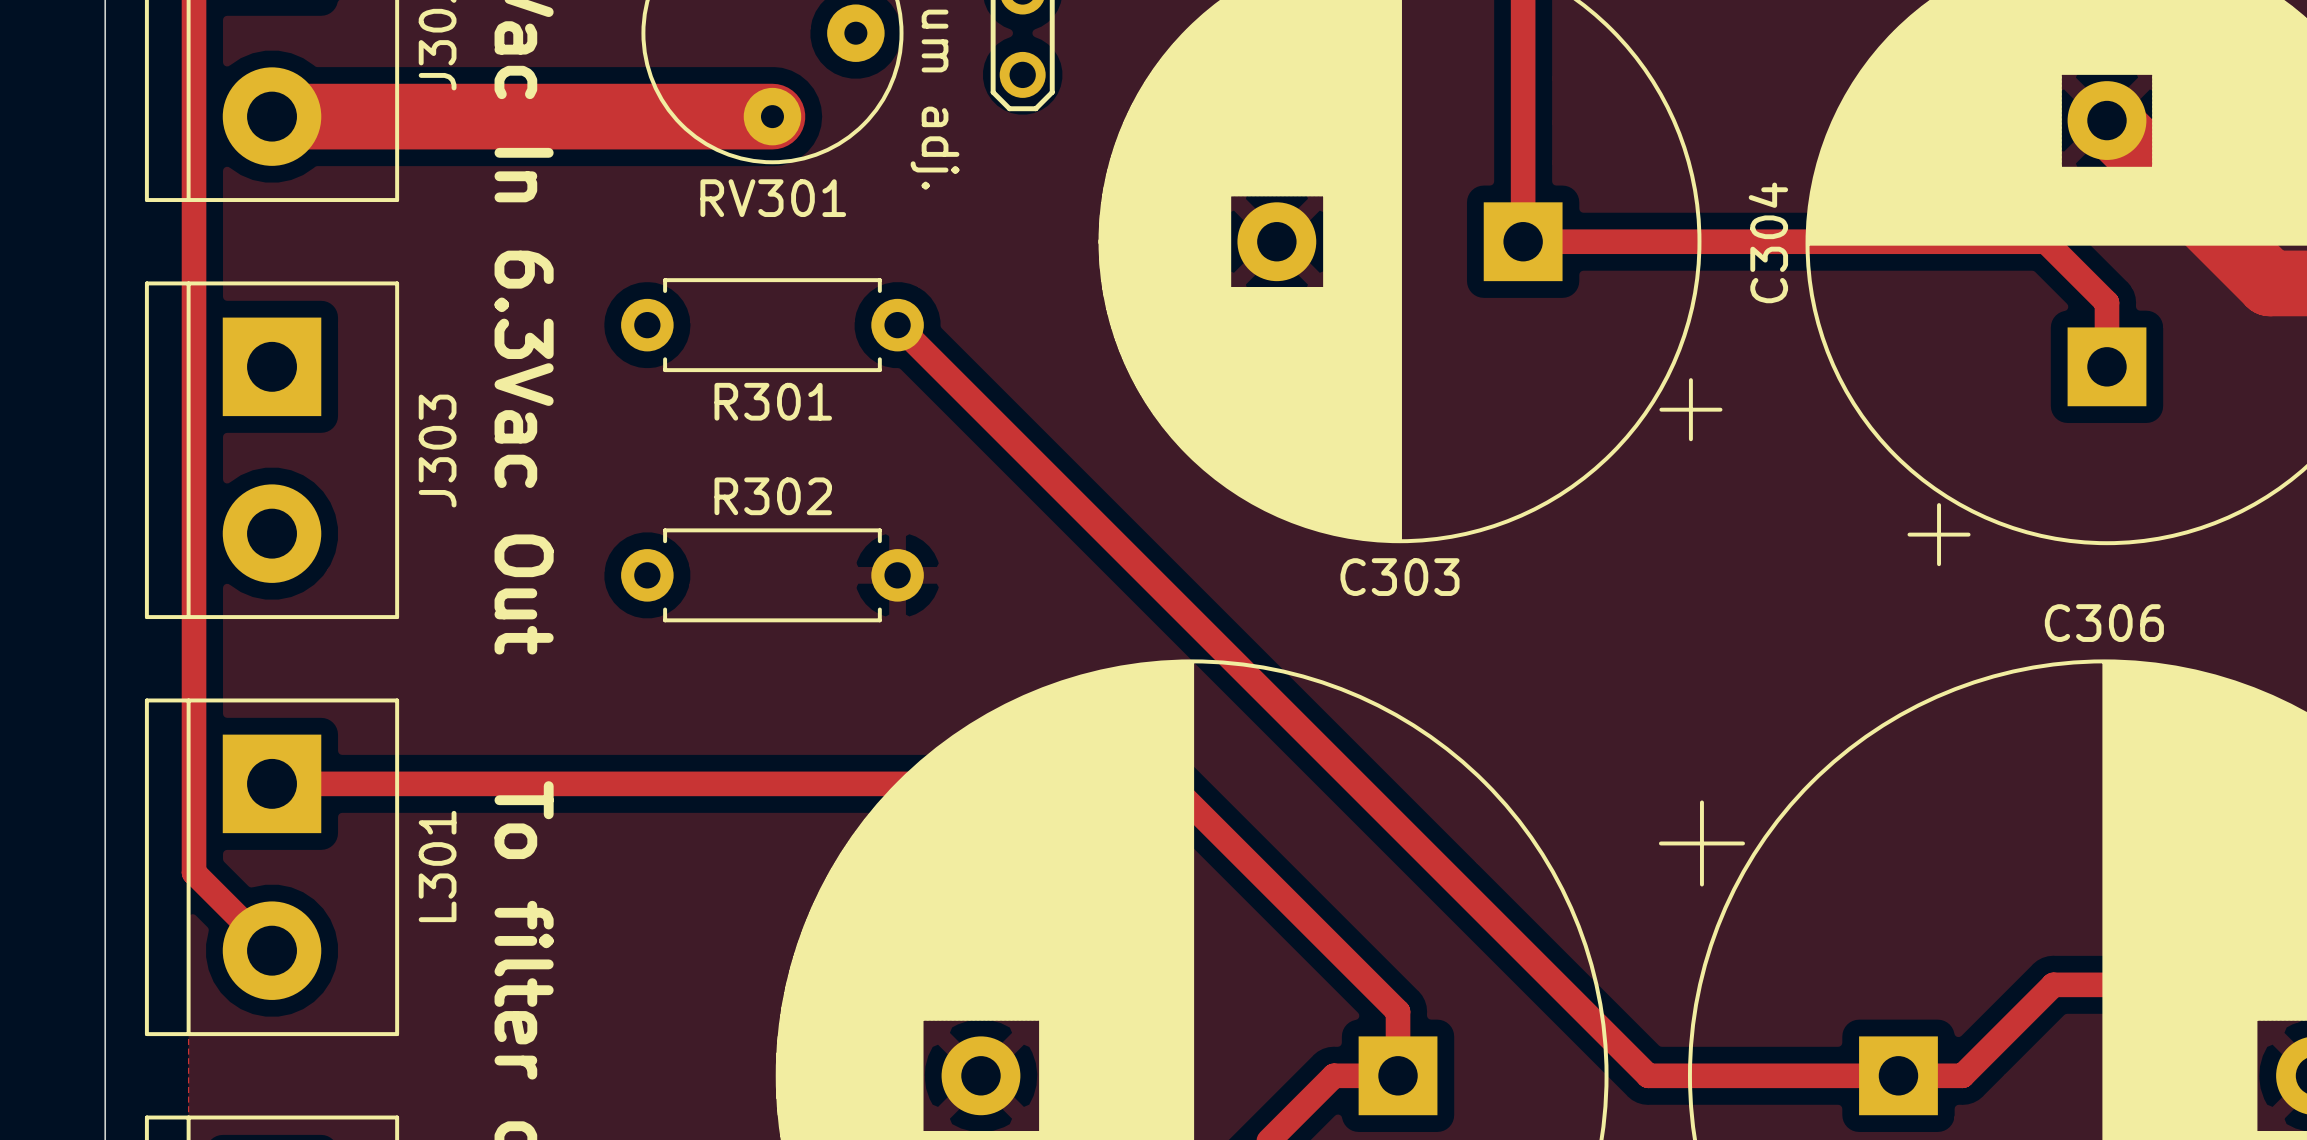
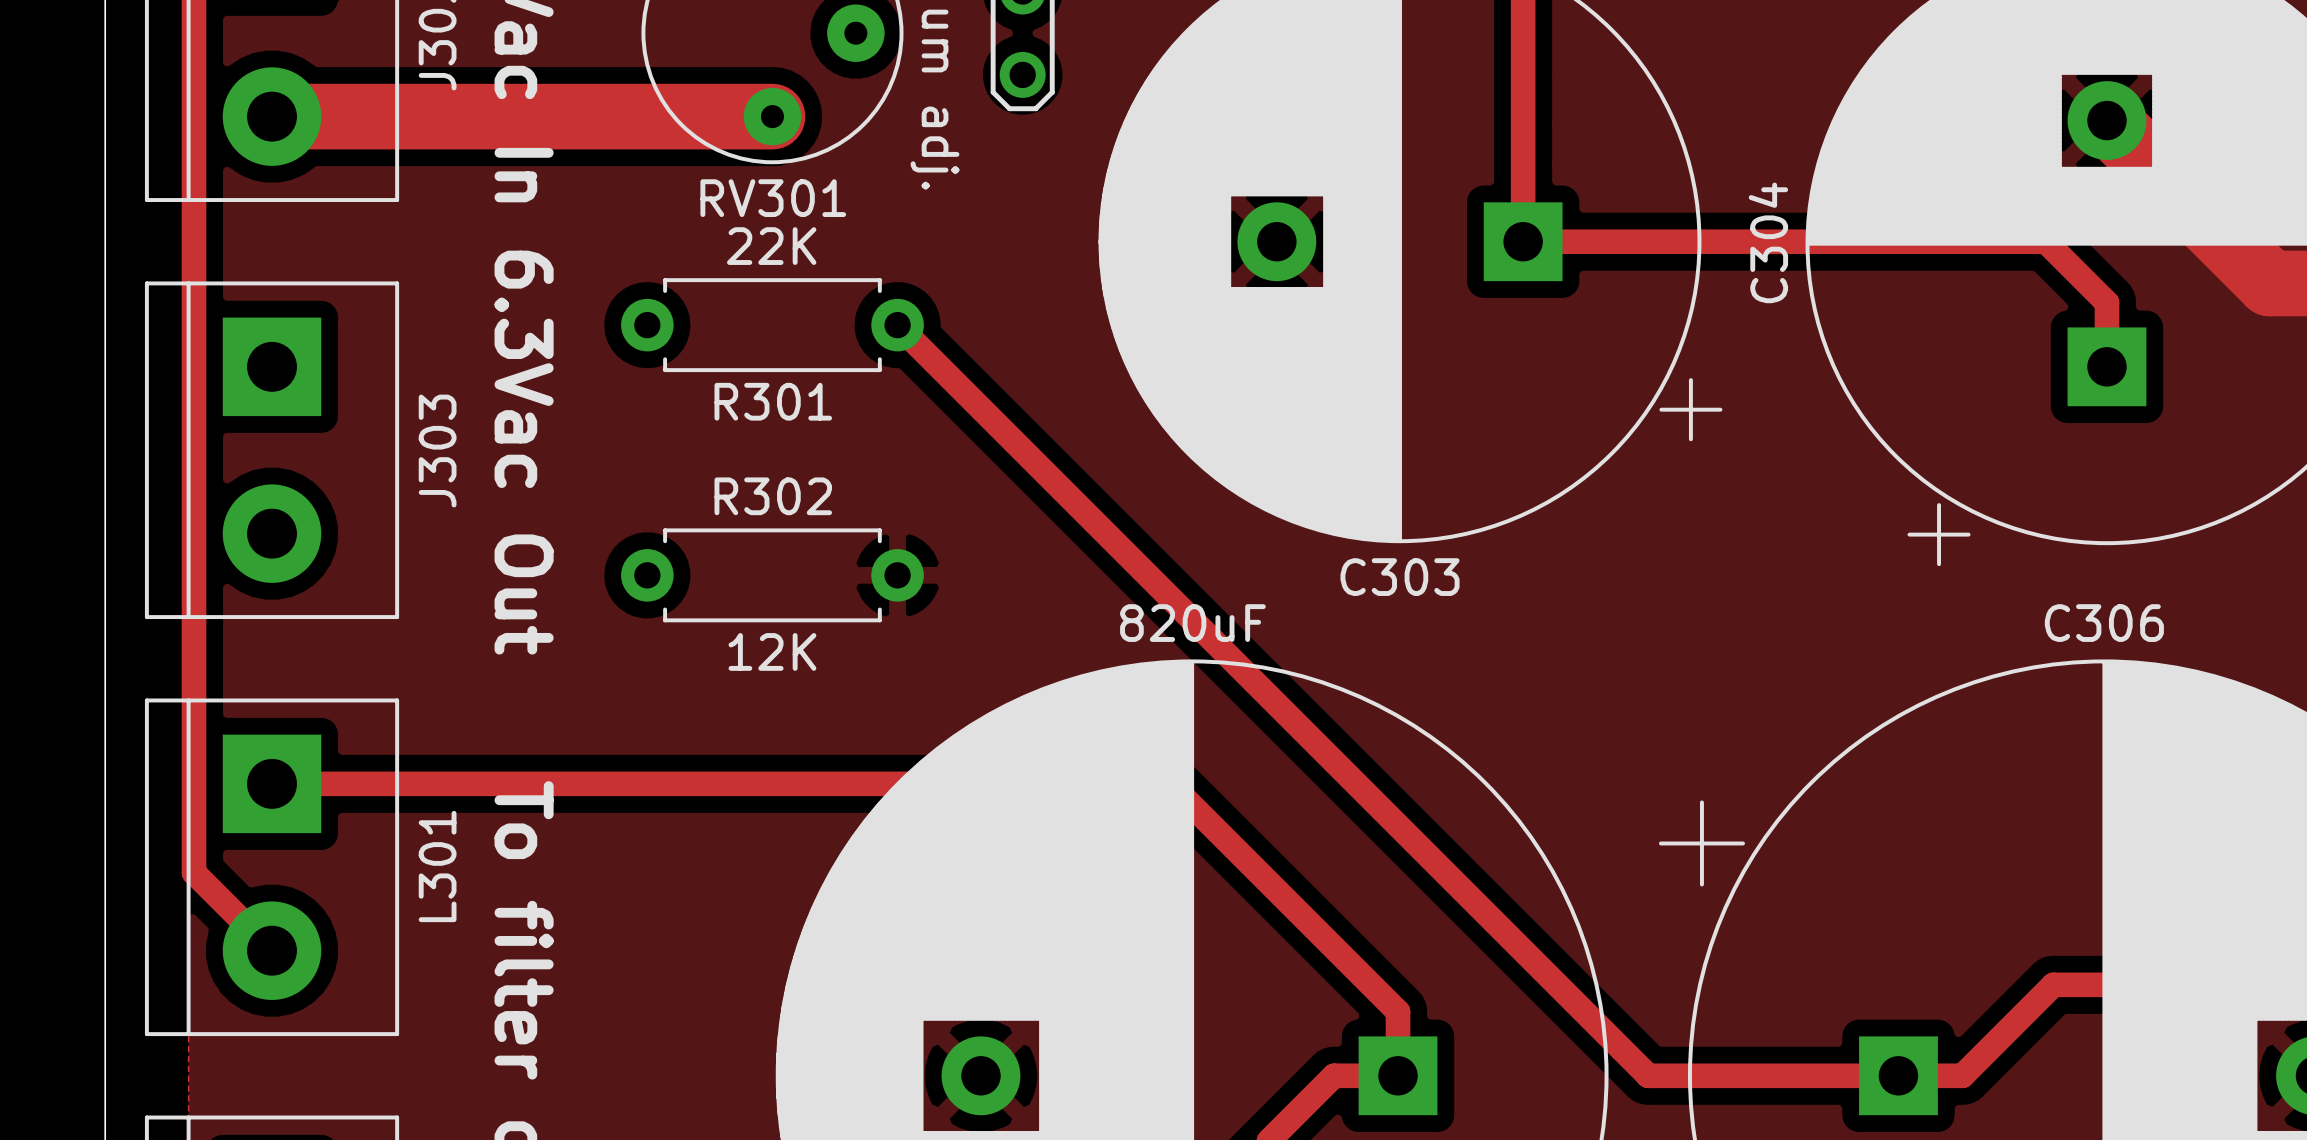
R301 value: none -> 22K (771, 246)
part value: none -> 820uF (1192, 623)
R302 value: none -> 12K (772, 651)

